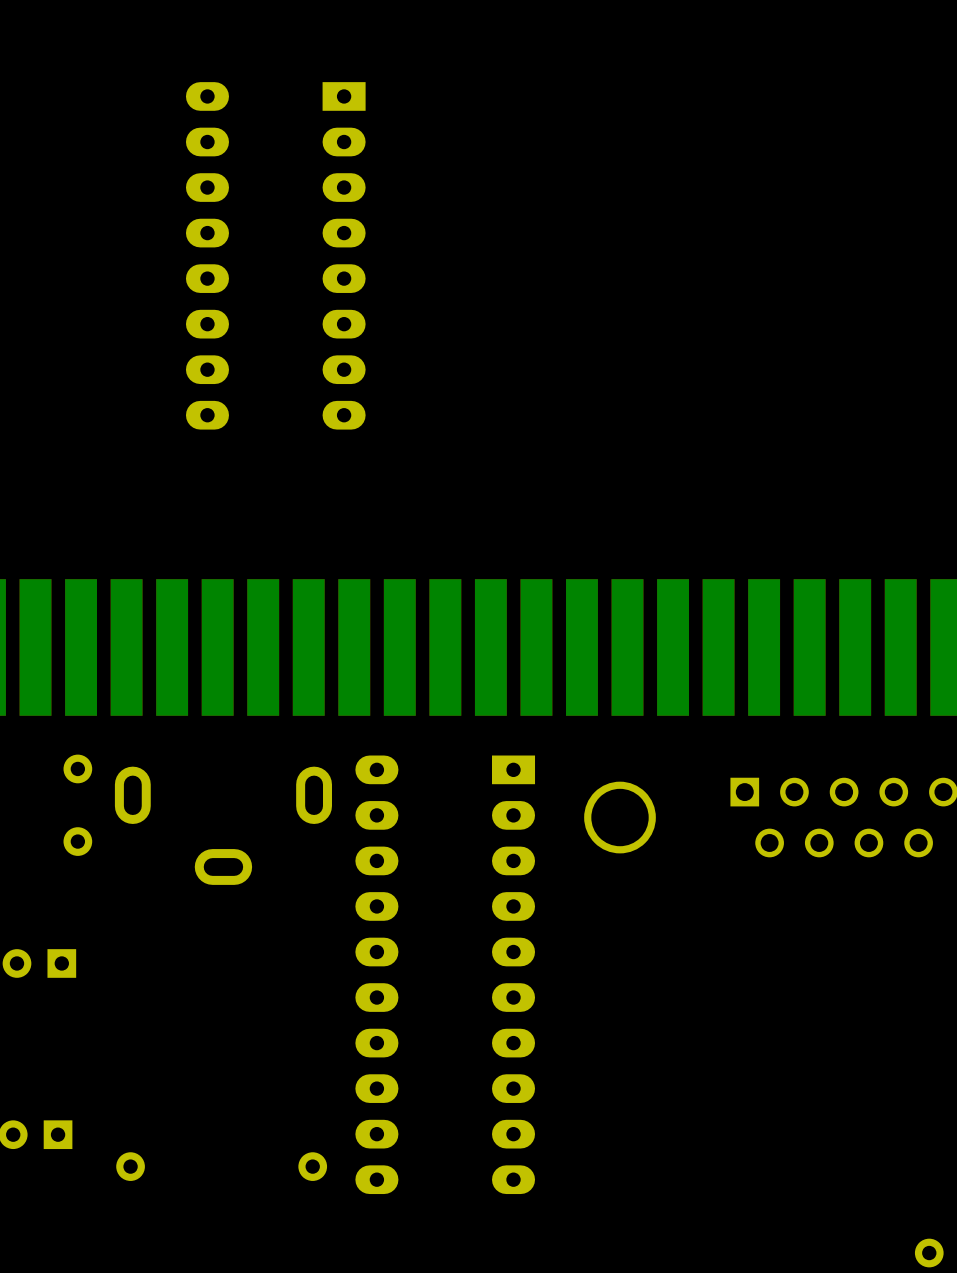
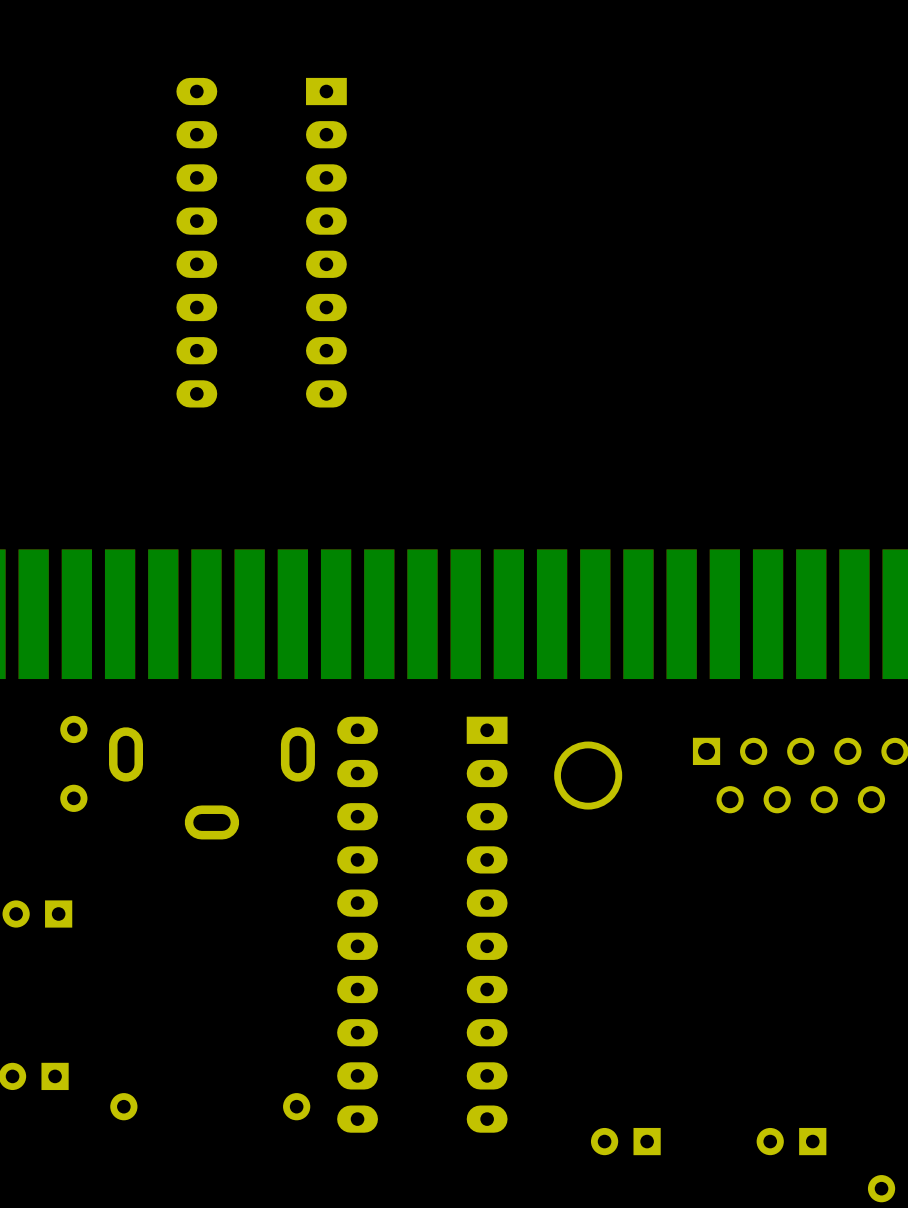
part: none -> (625, 1141)
part: none -> (791, 1141)

